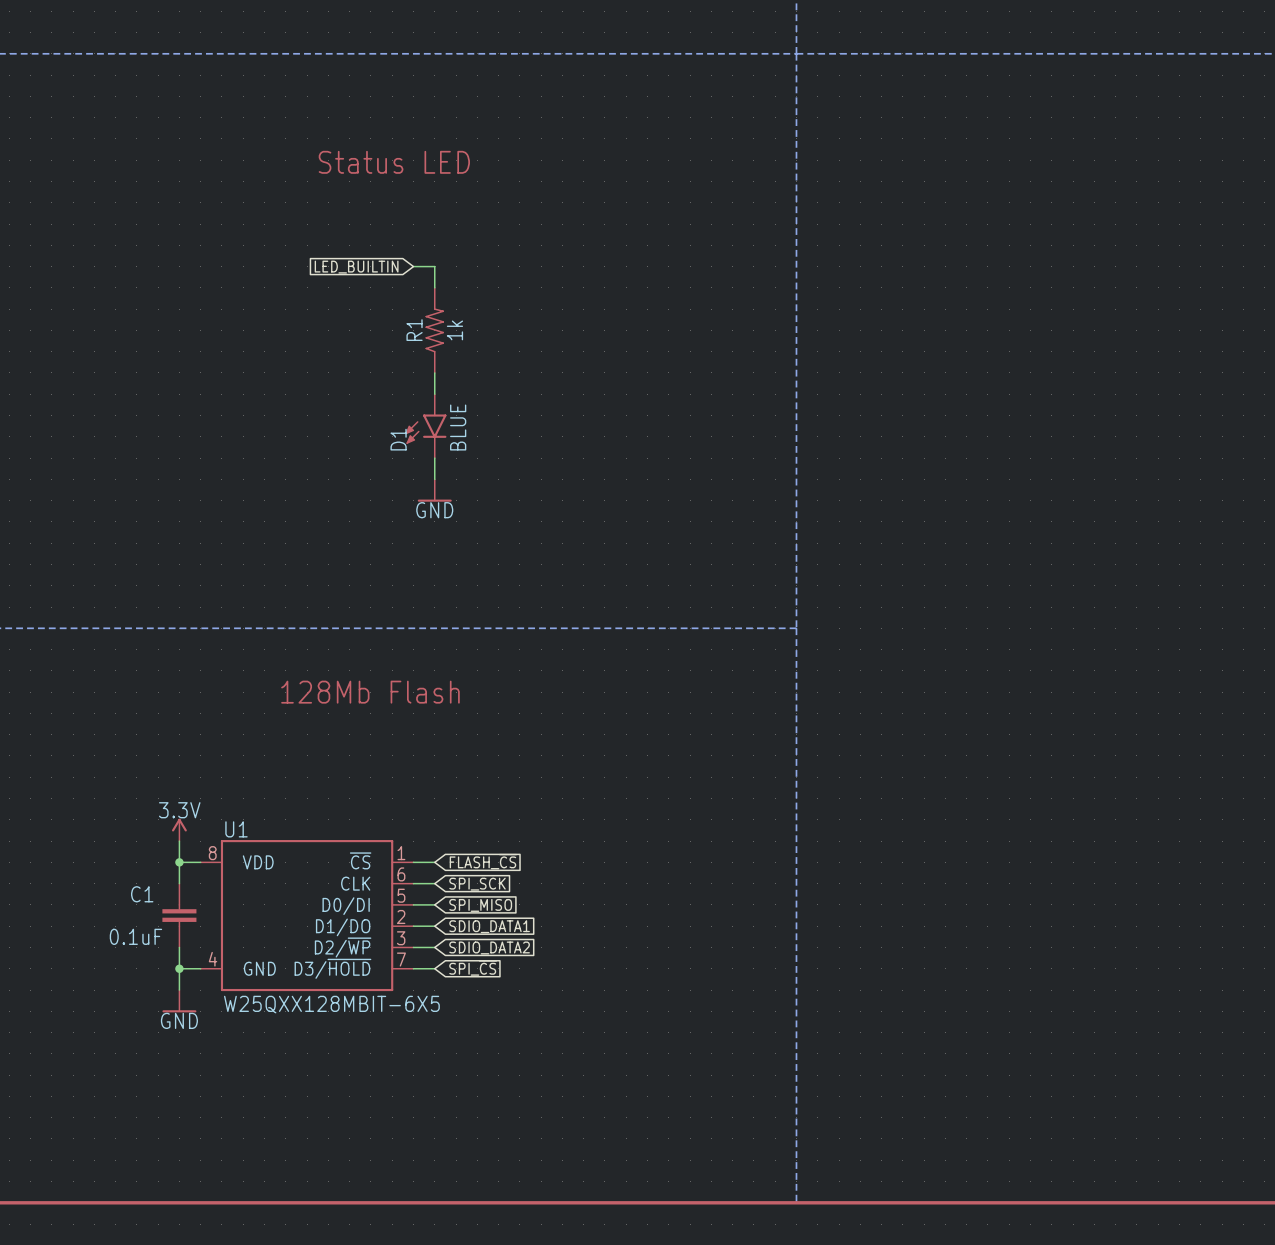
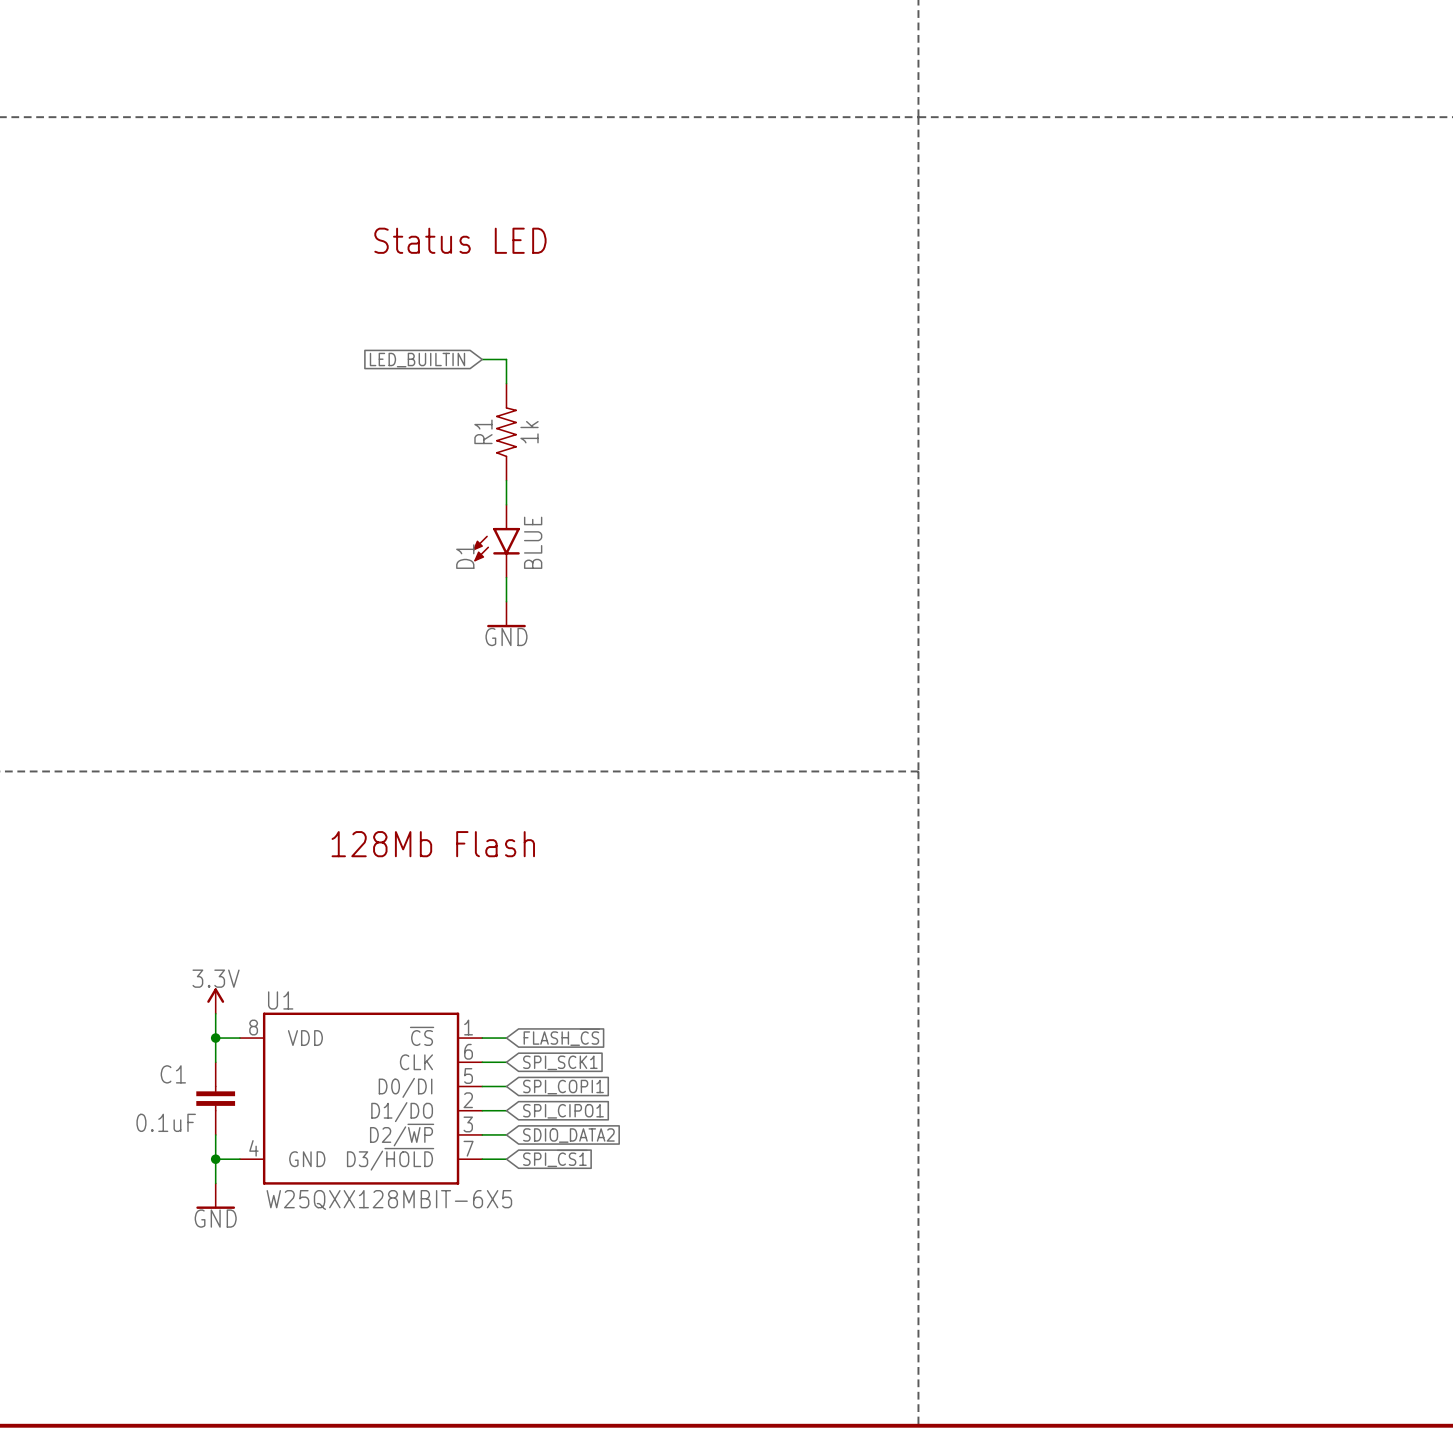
global label: SPI_SCK (477, 884) -> SPI_SCK1 (560, 1062)
global label: SPI_MISO (480, 905) -> SPI_COPI1 (563, 1087)
global label: SDIO_DATA1 (489, 926) -> SPI_CIPO1 (563, 1111)
global label: SPI_~{CS} (473, 968) -> SPI_~{CS1} (555, 1158)

